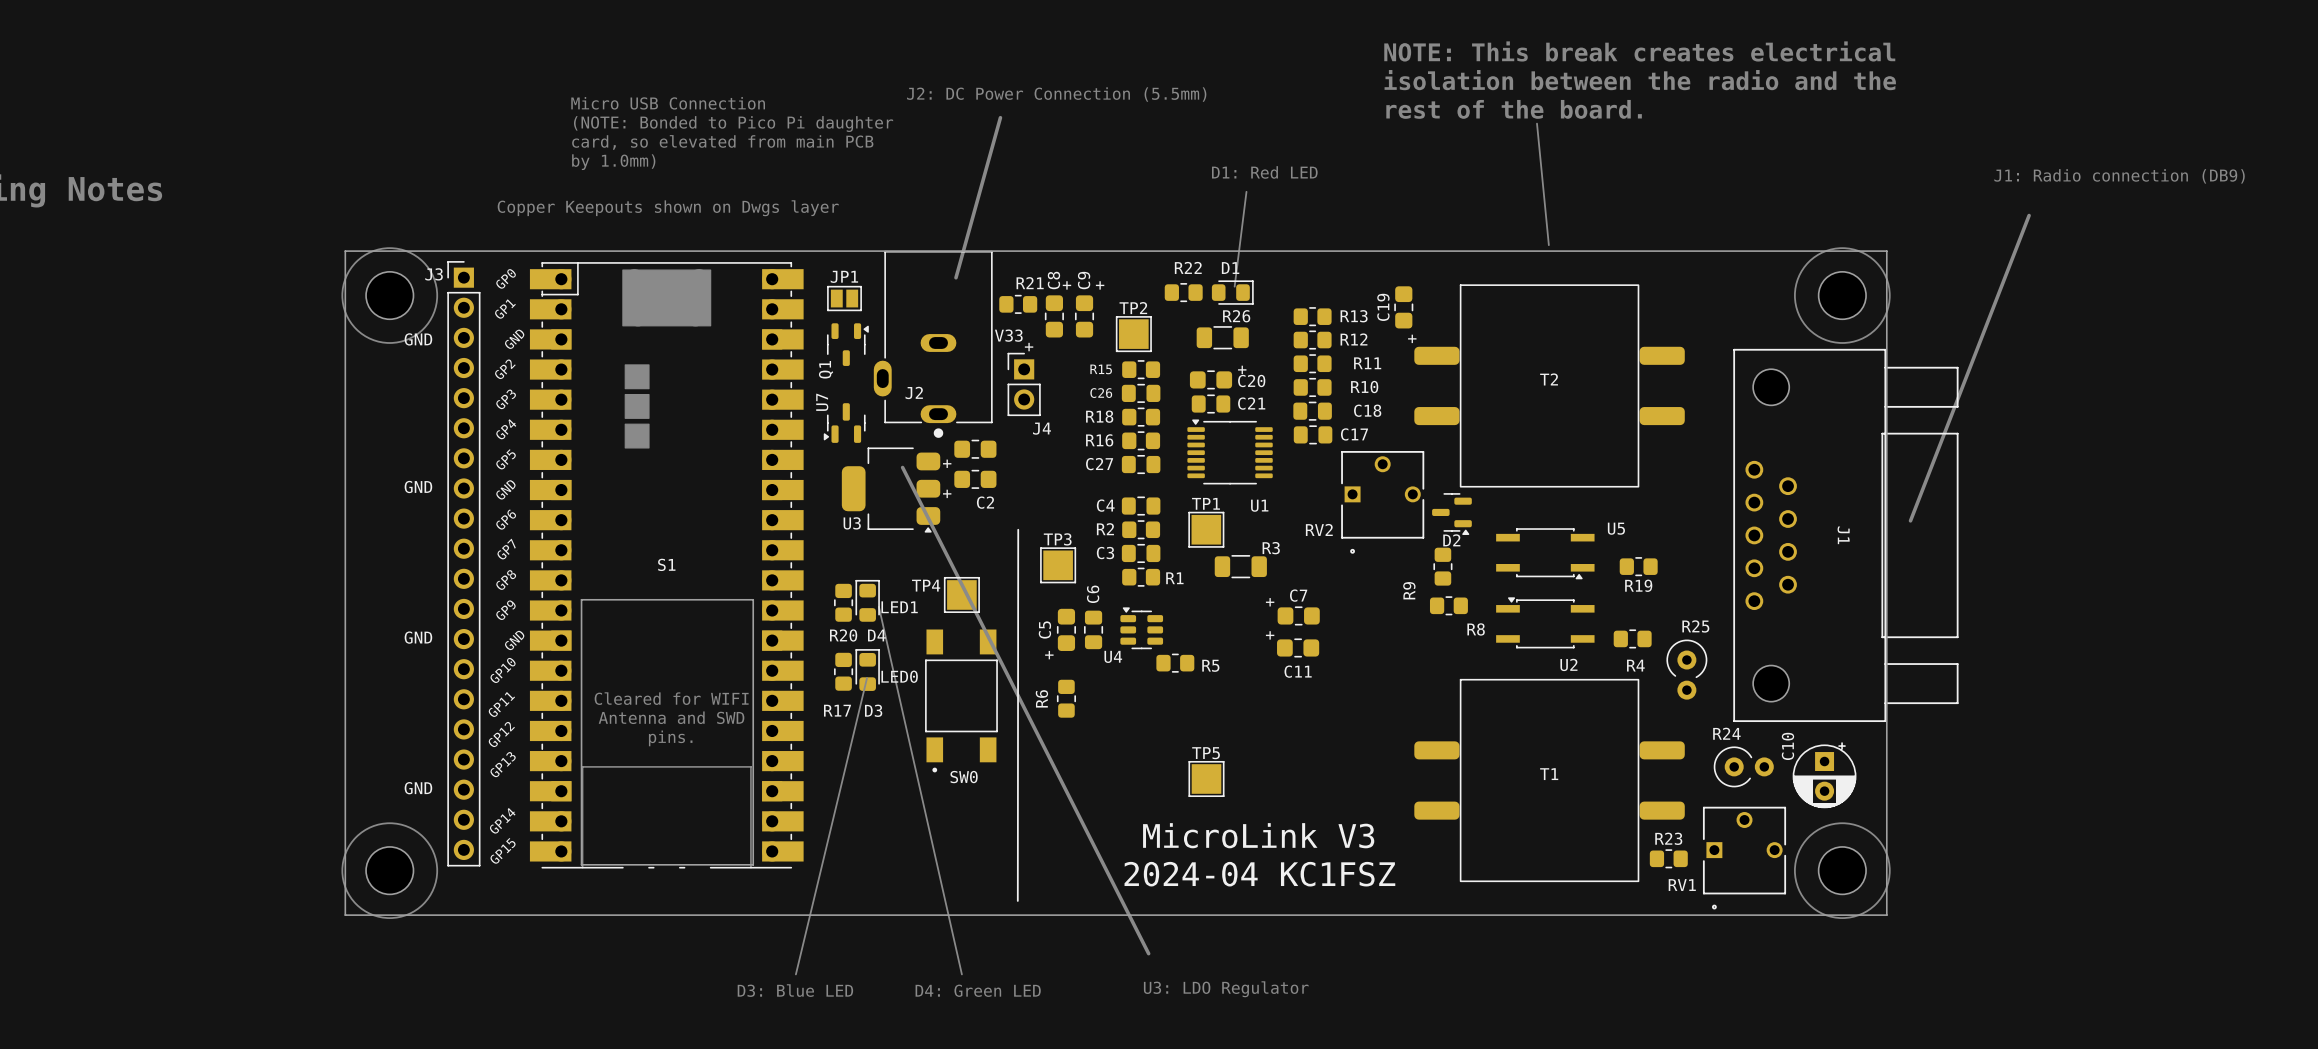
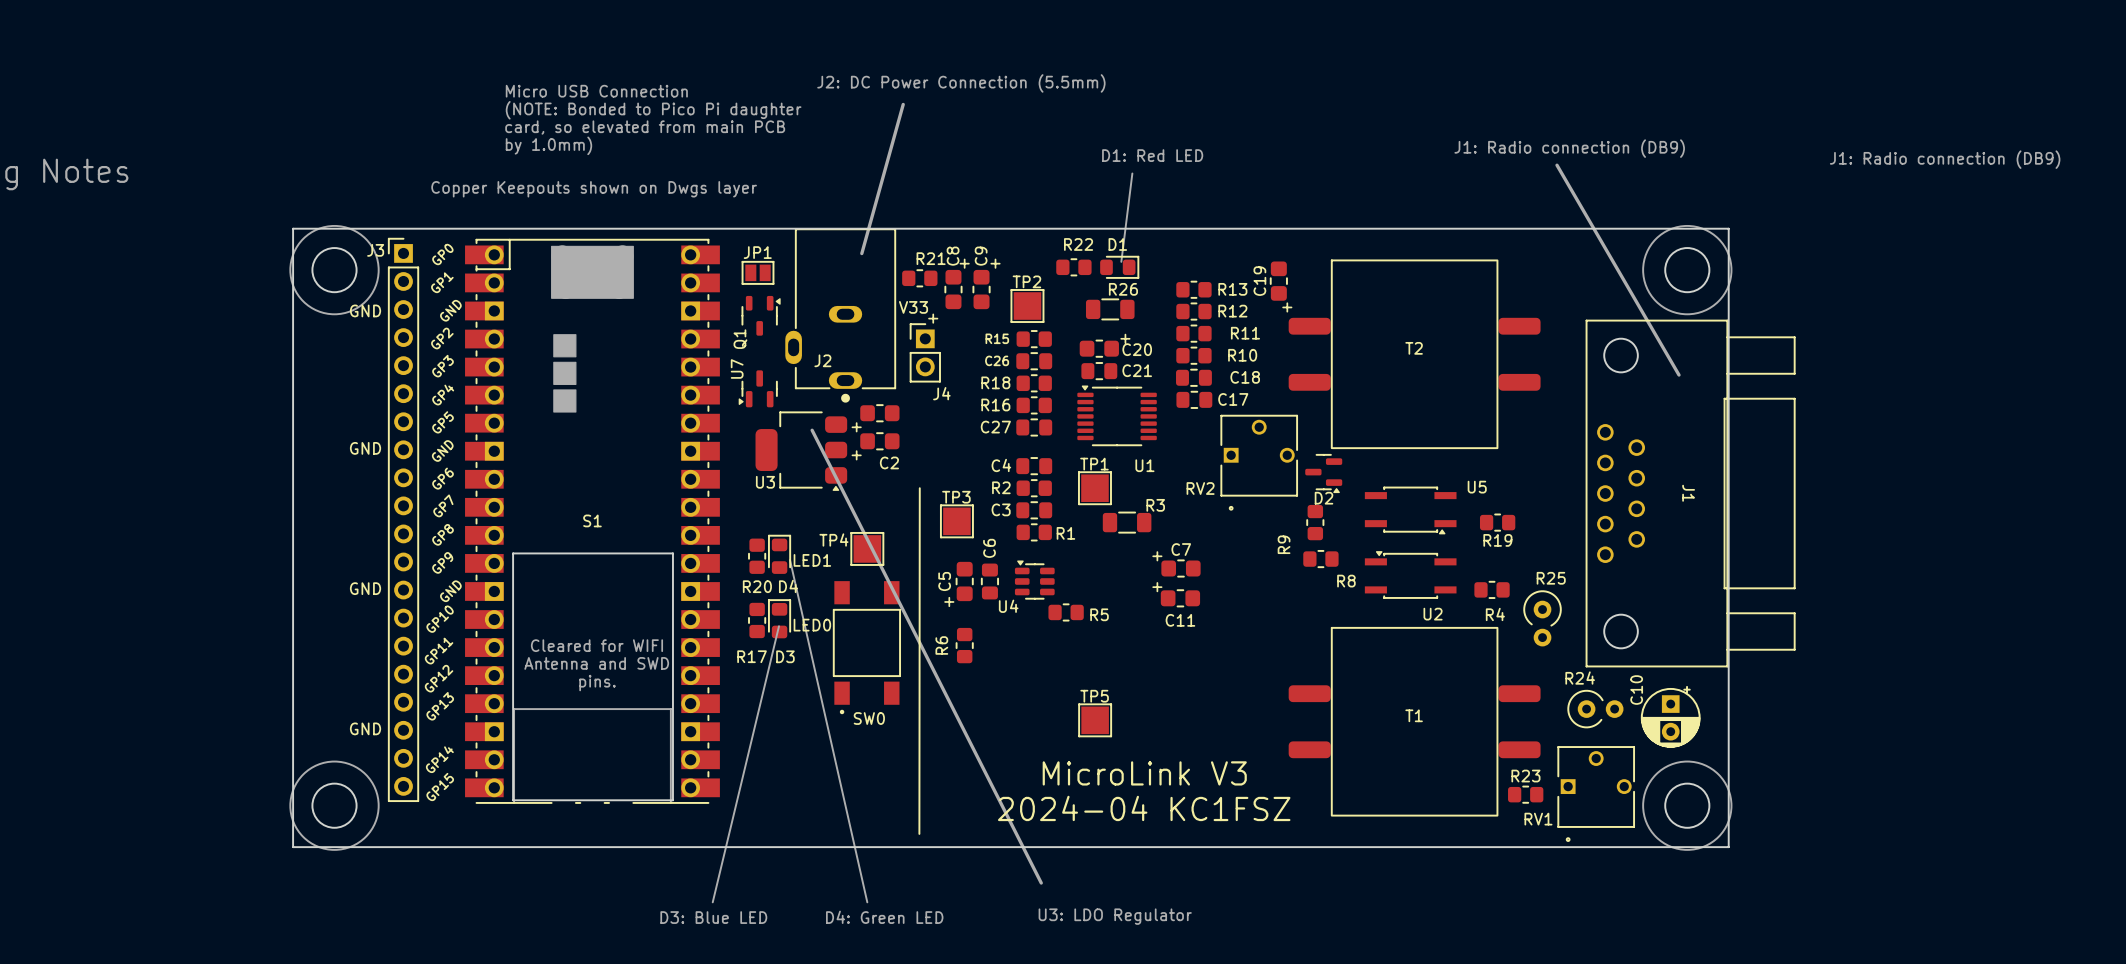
text: NOTE: This break creates electrical (1639, 51) -> none
text: isolation between the radio and the (1640, 80) -> none
text: rest of the board. (1514, 109) -> none
line: (1537, 123) (1548, 245) -> none
text: none -> J1: Radio connection (DB9) (1569, 148)
line: none -> (1556, 165) (1679, 375)
line: (2029, 215) (1910, 520) -> none

